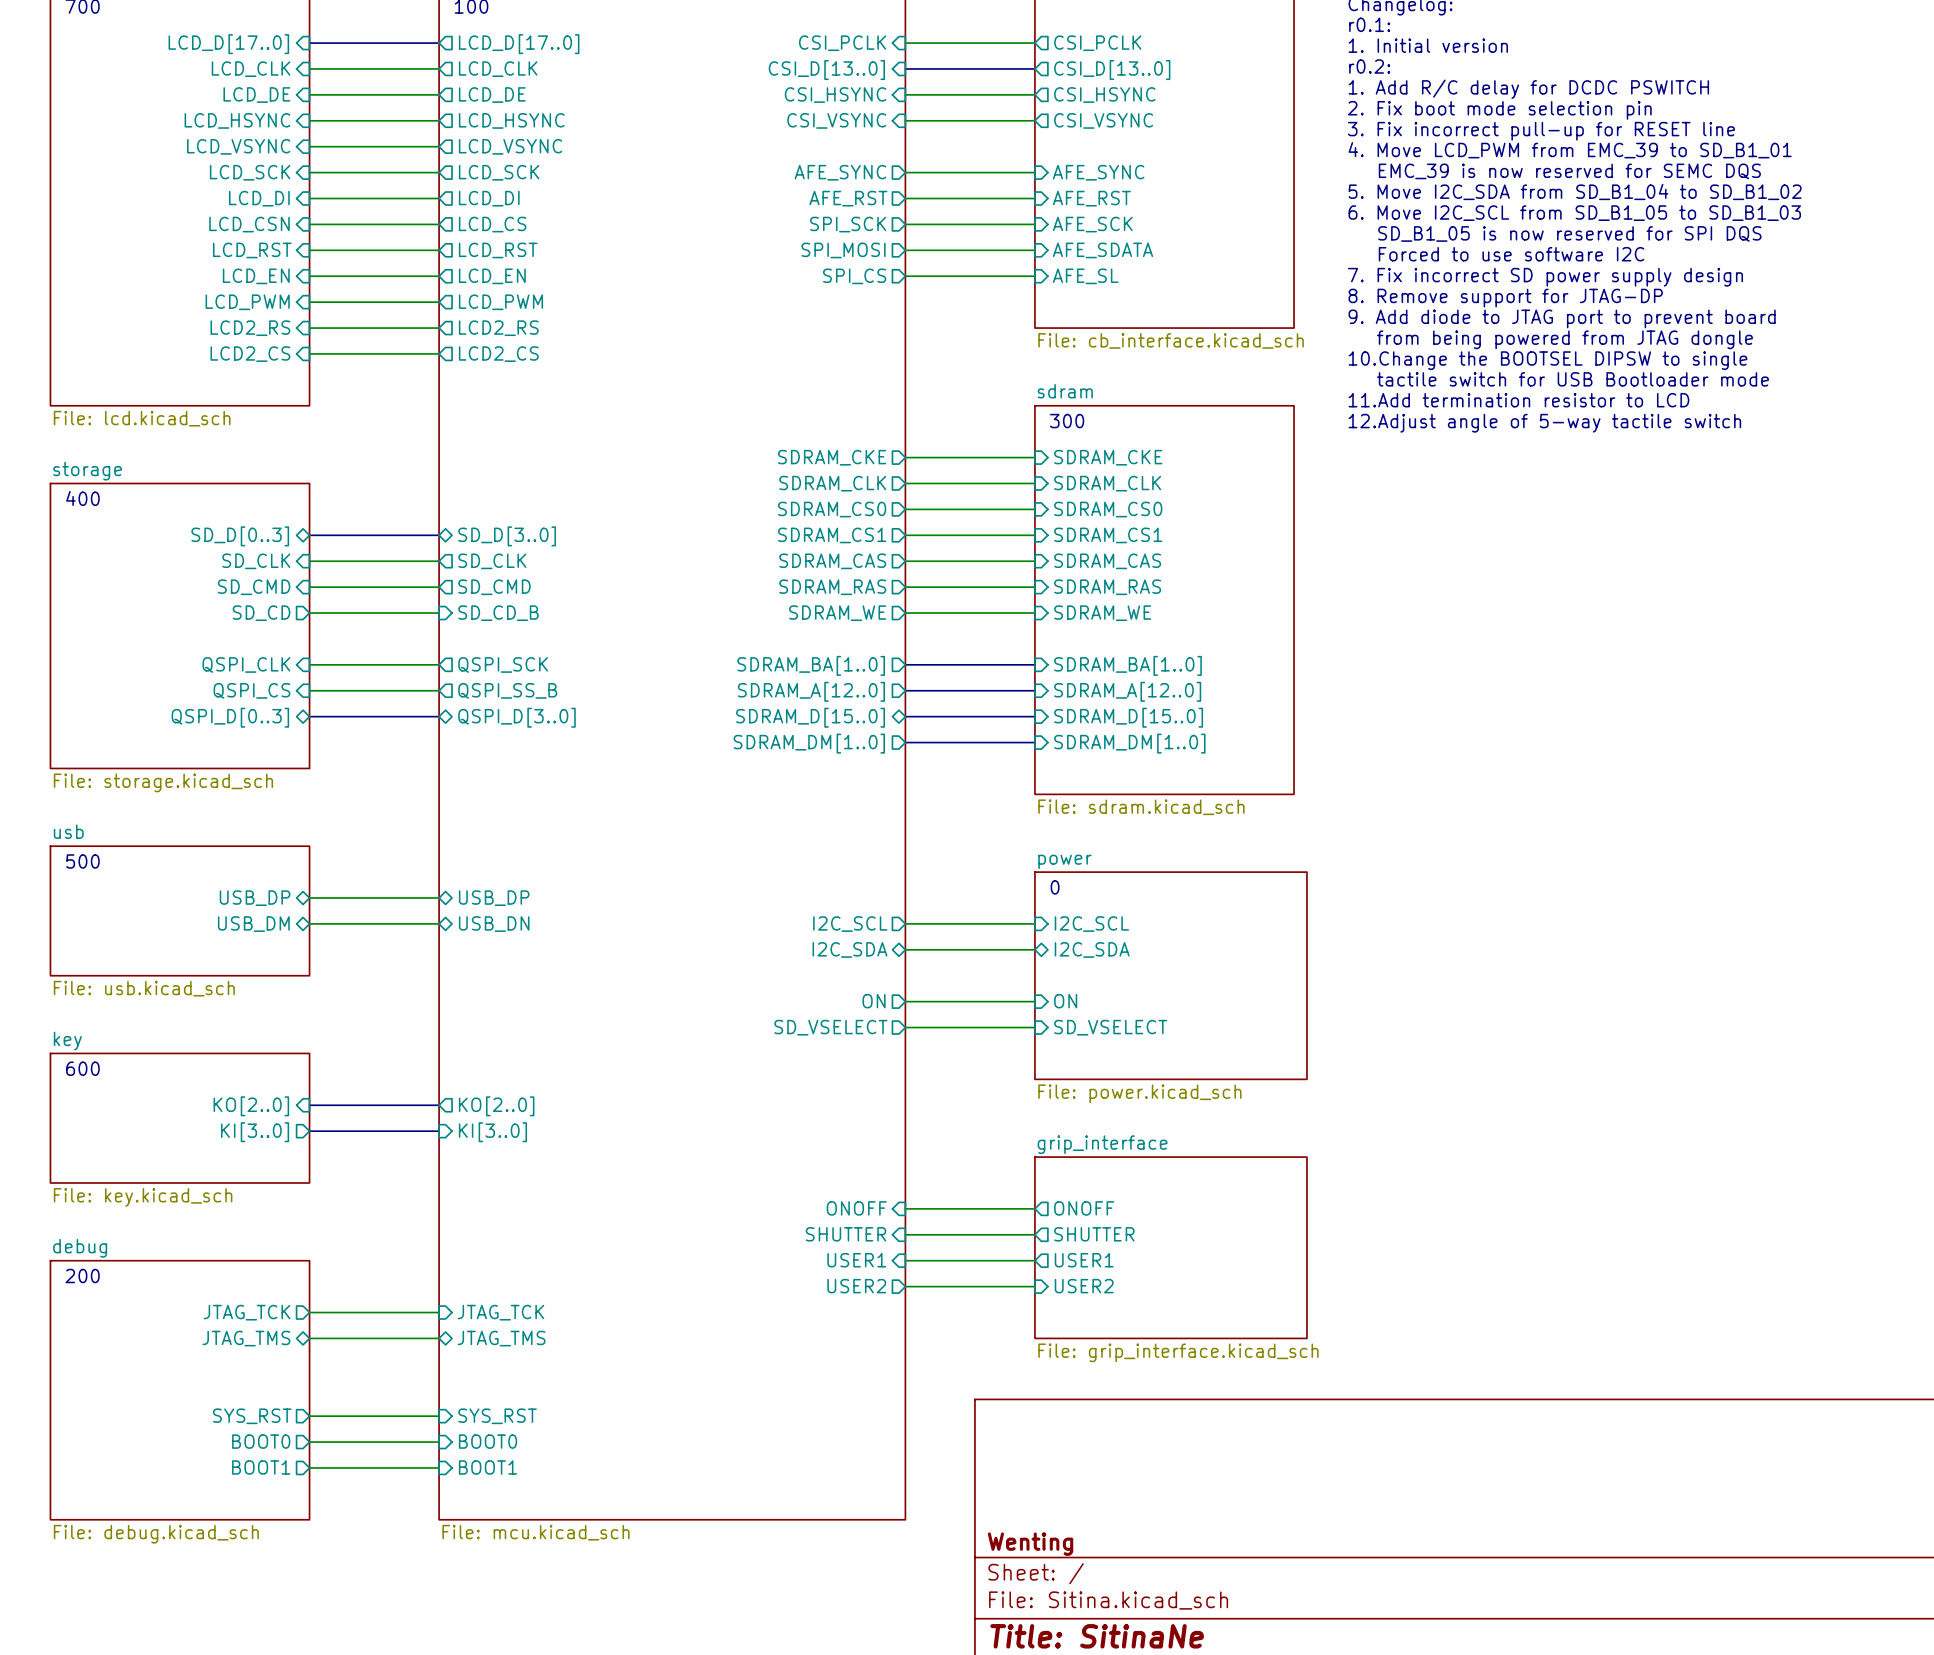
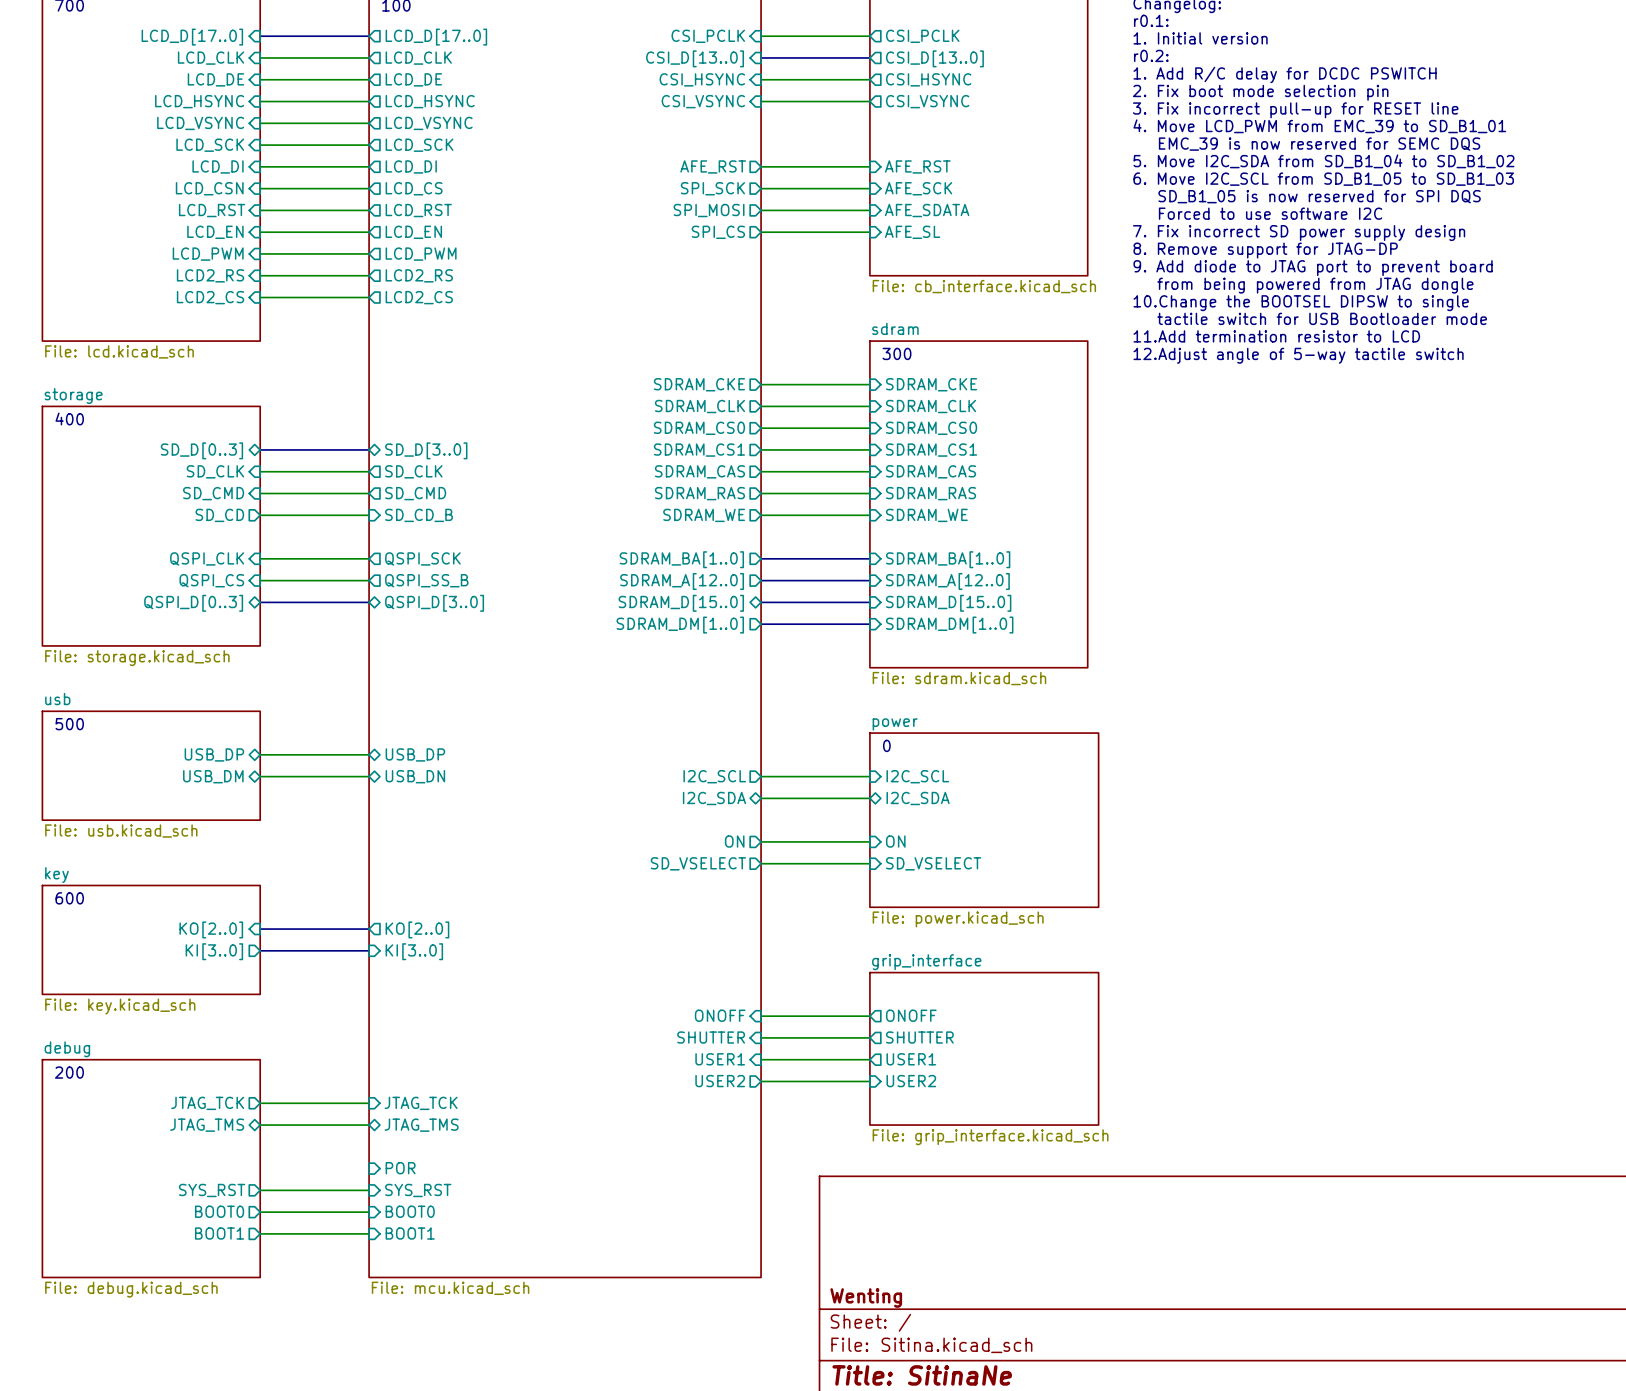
sheet pin: AFE_SYNC (840, 172) -> none
wire: (905, 172) (1034, 172) -> none
sheet pin: AFE_SYNC (1098, 172) -> none
sheet pin: none -> POR (400, 1168)

